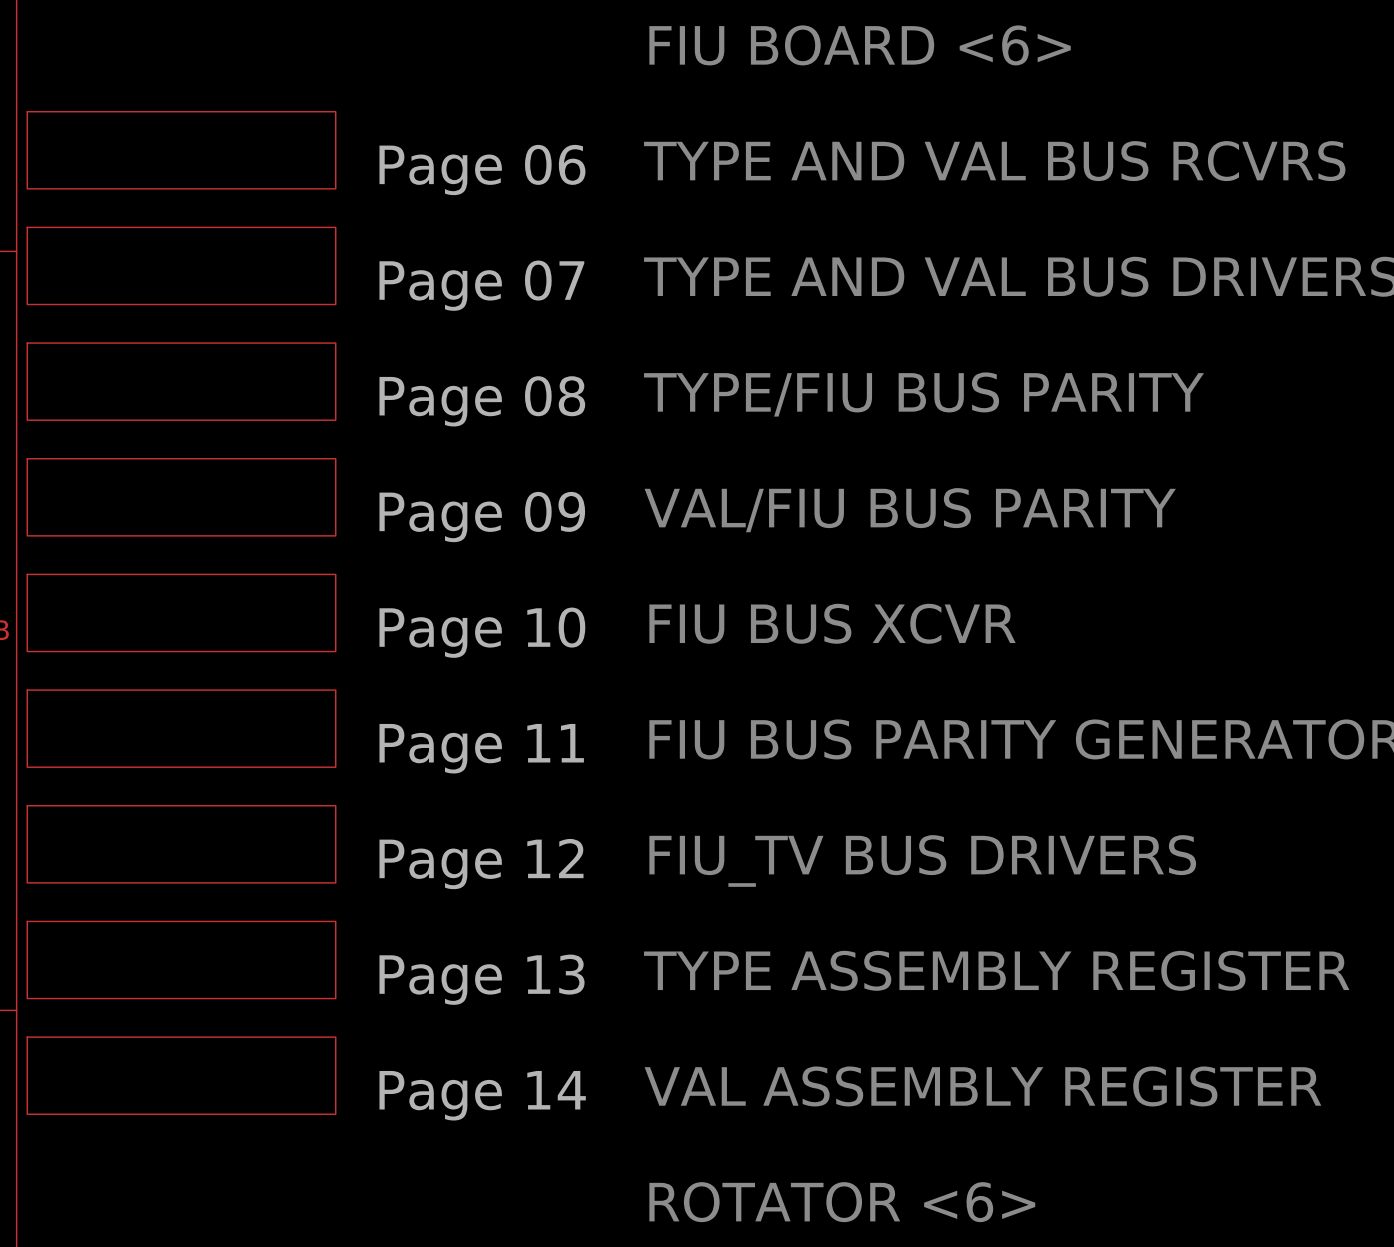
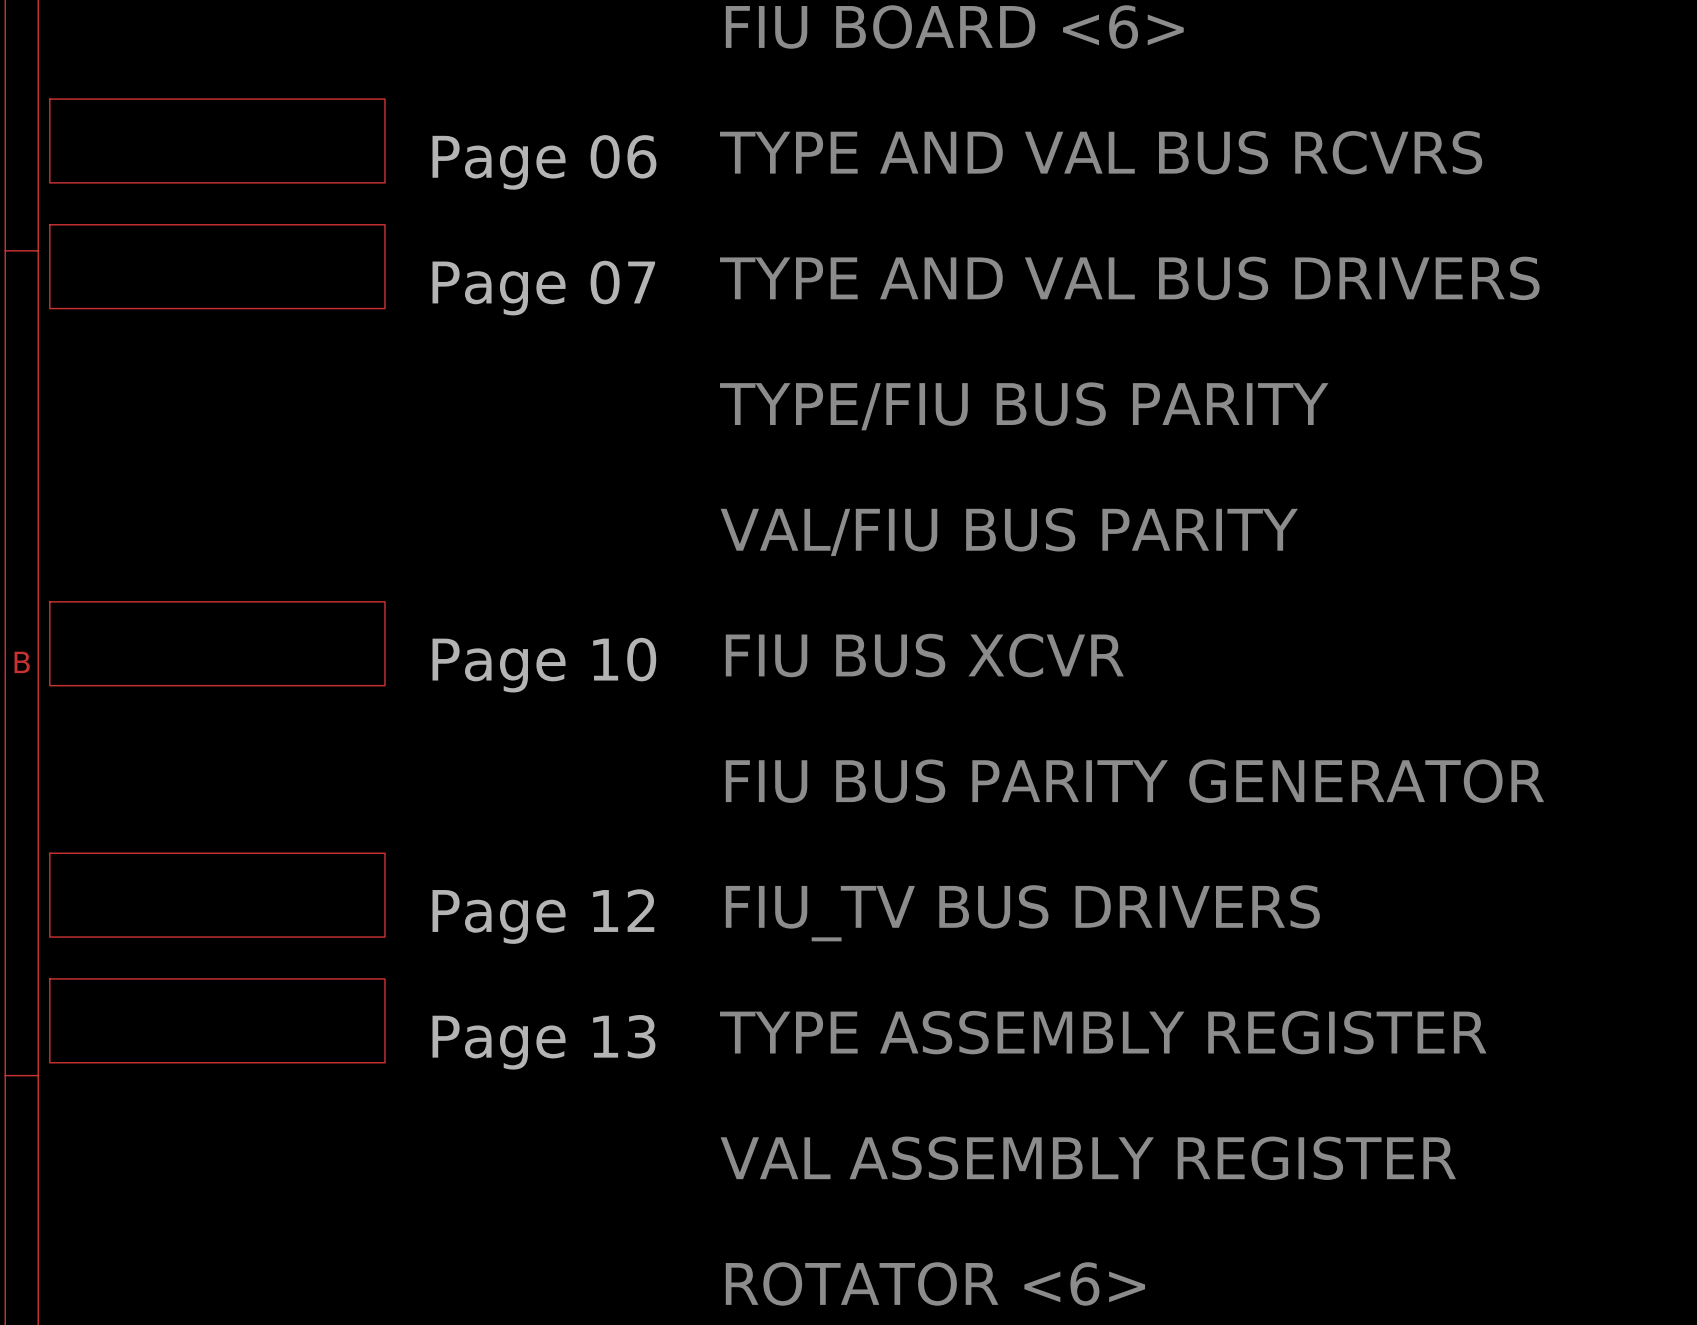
sheet Page 08: (181, 381) -> none
sheet Page 09: (181, 497) -> none
sheet Page 11: (181, 728) -> none
sheet Page 14: (181, 1075) -> none

